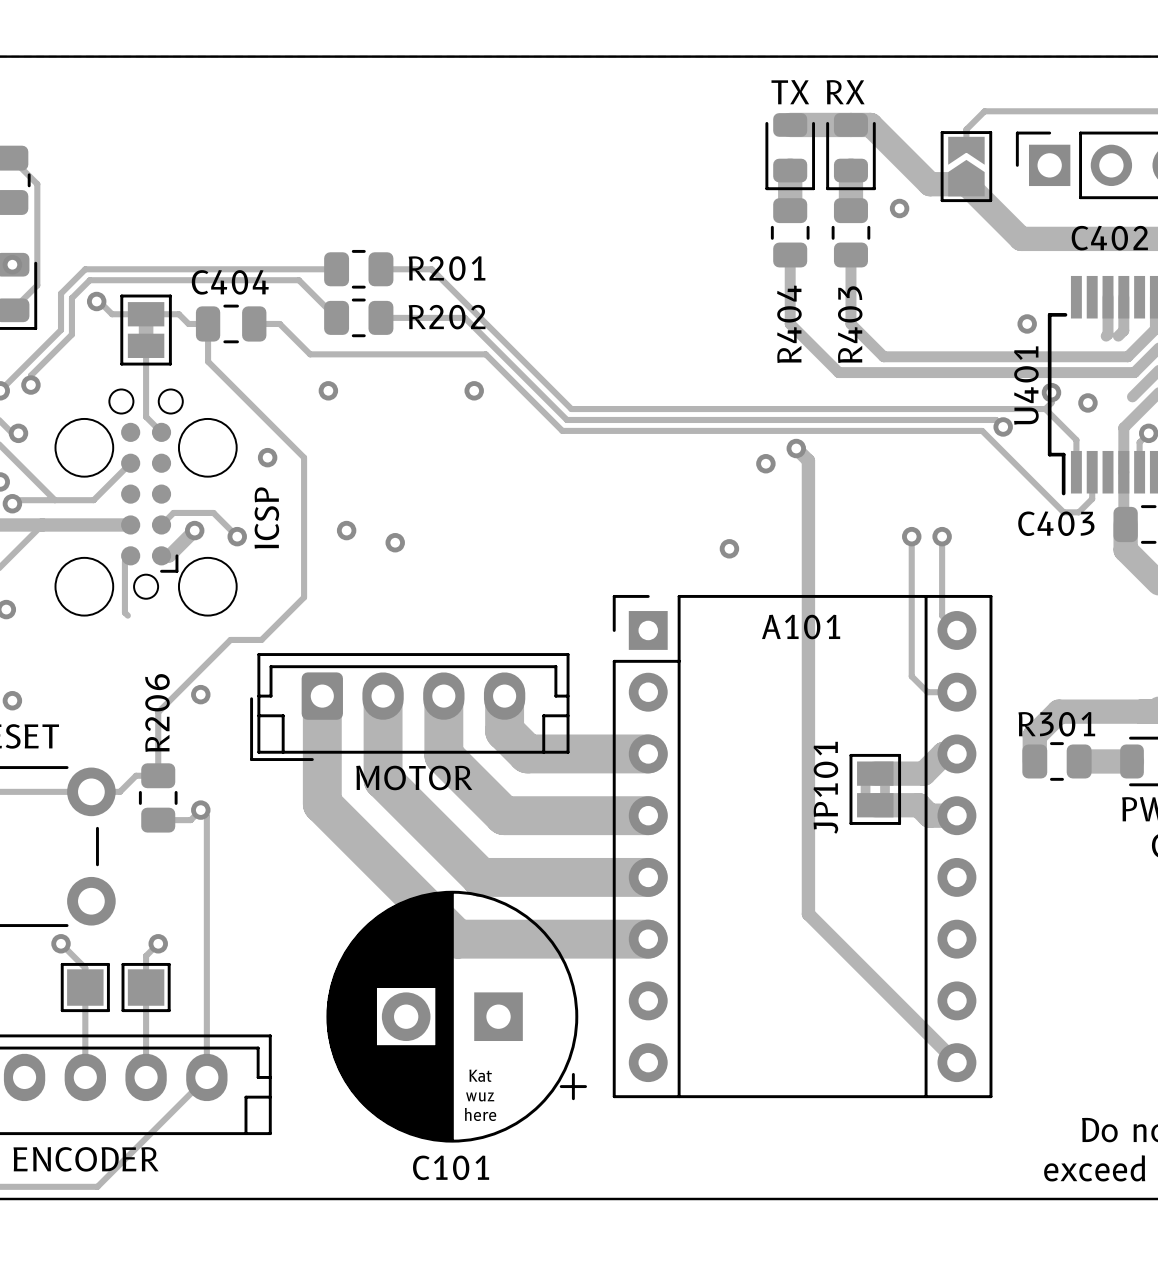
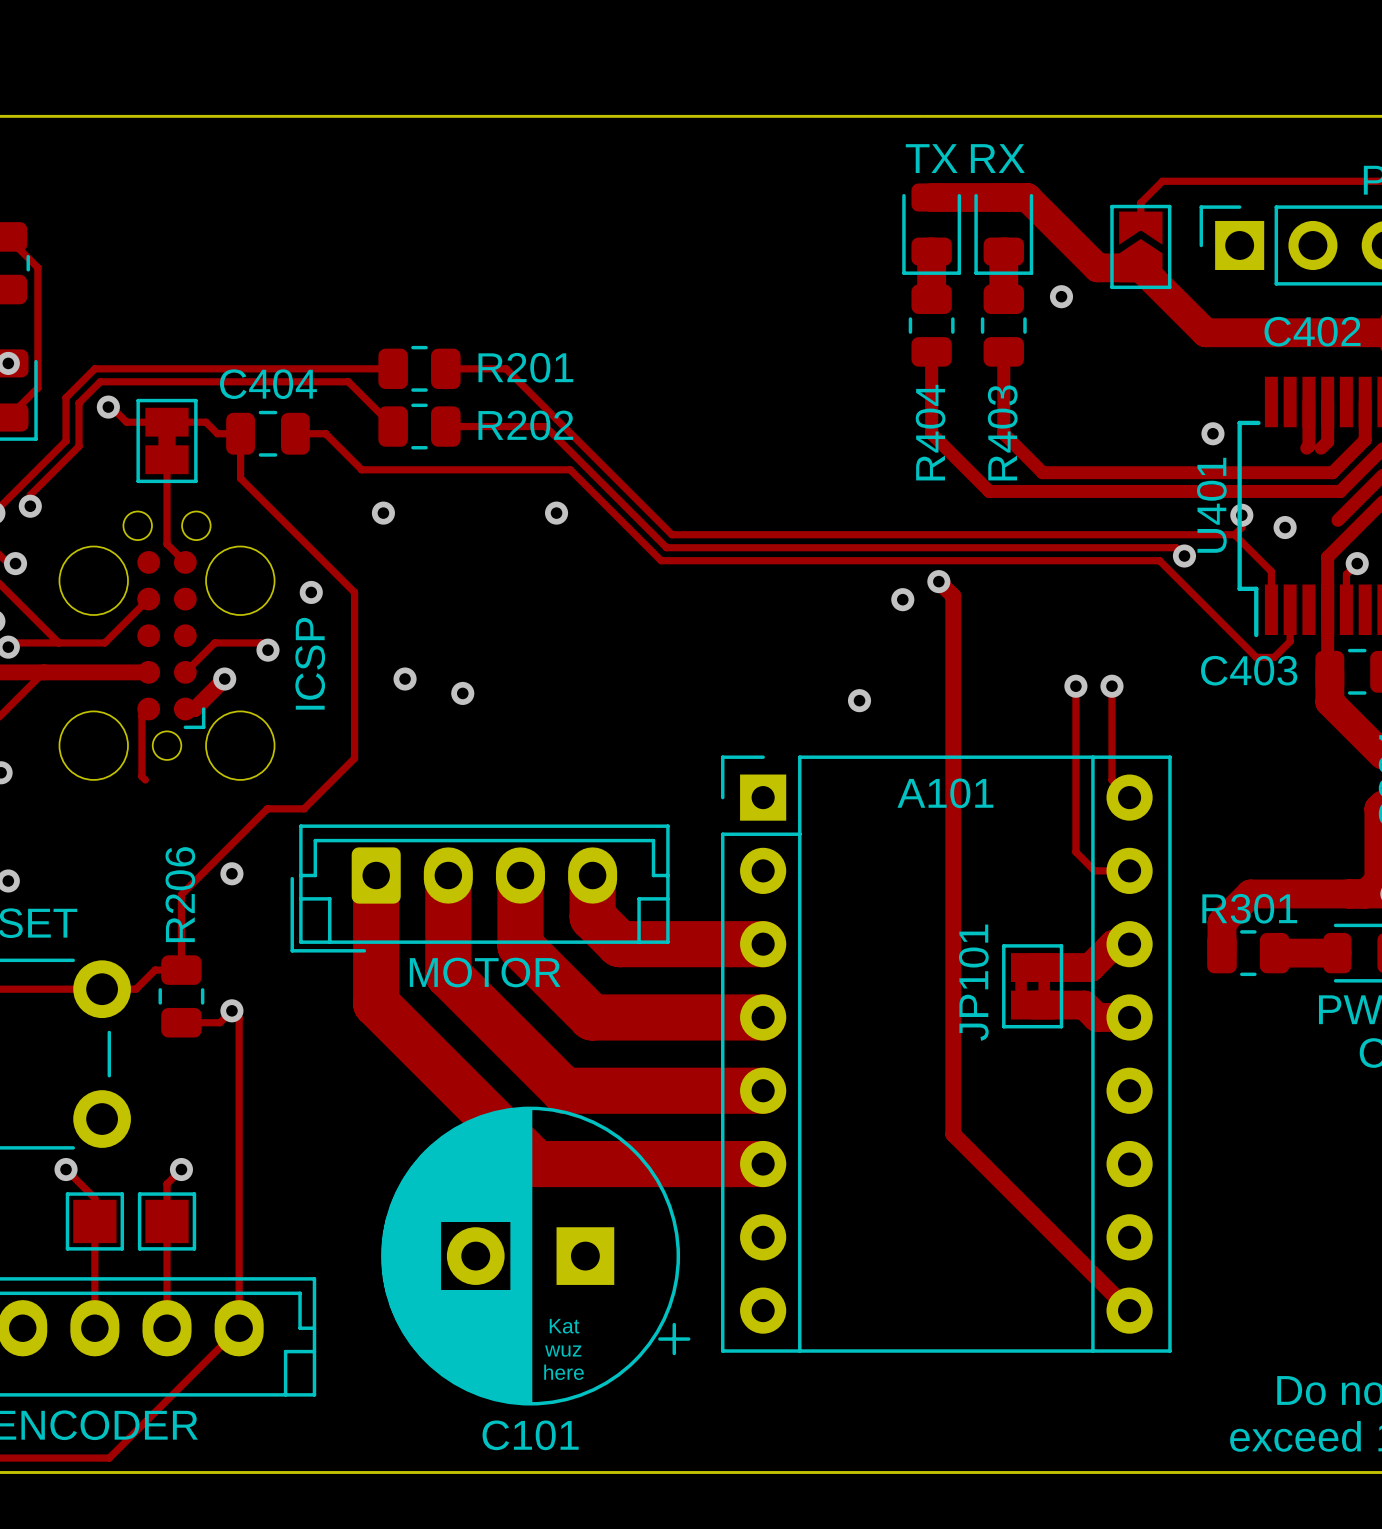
track: (173, 512) (213, 512) (237, 536) -> (199, 658) (214, 642) (260, 642) (268, 650)
via position: (237, 536) -> (268, 650)

